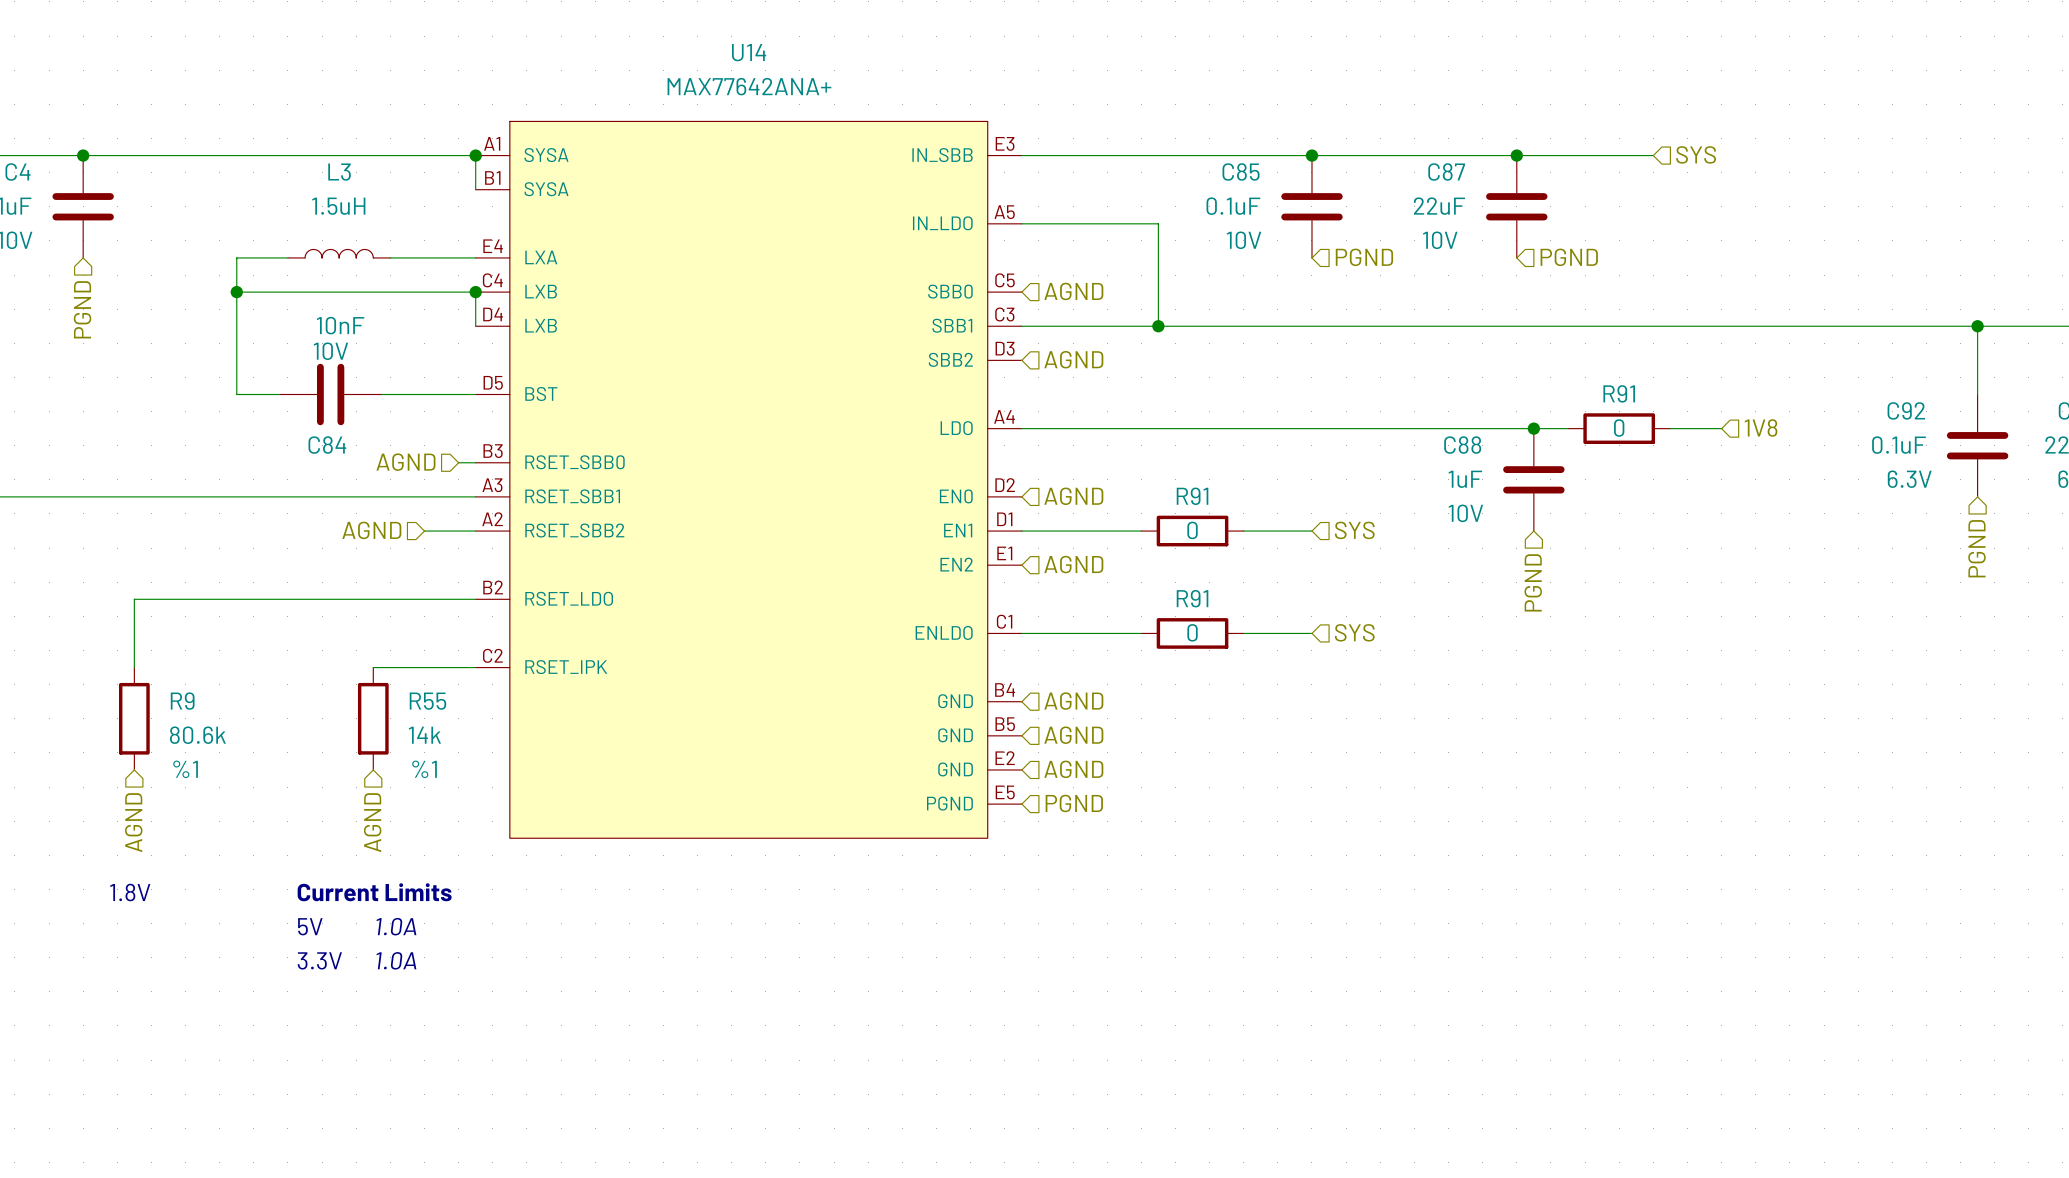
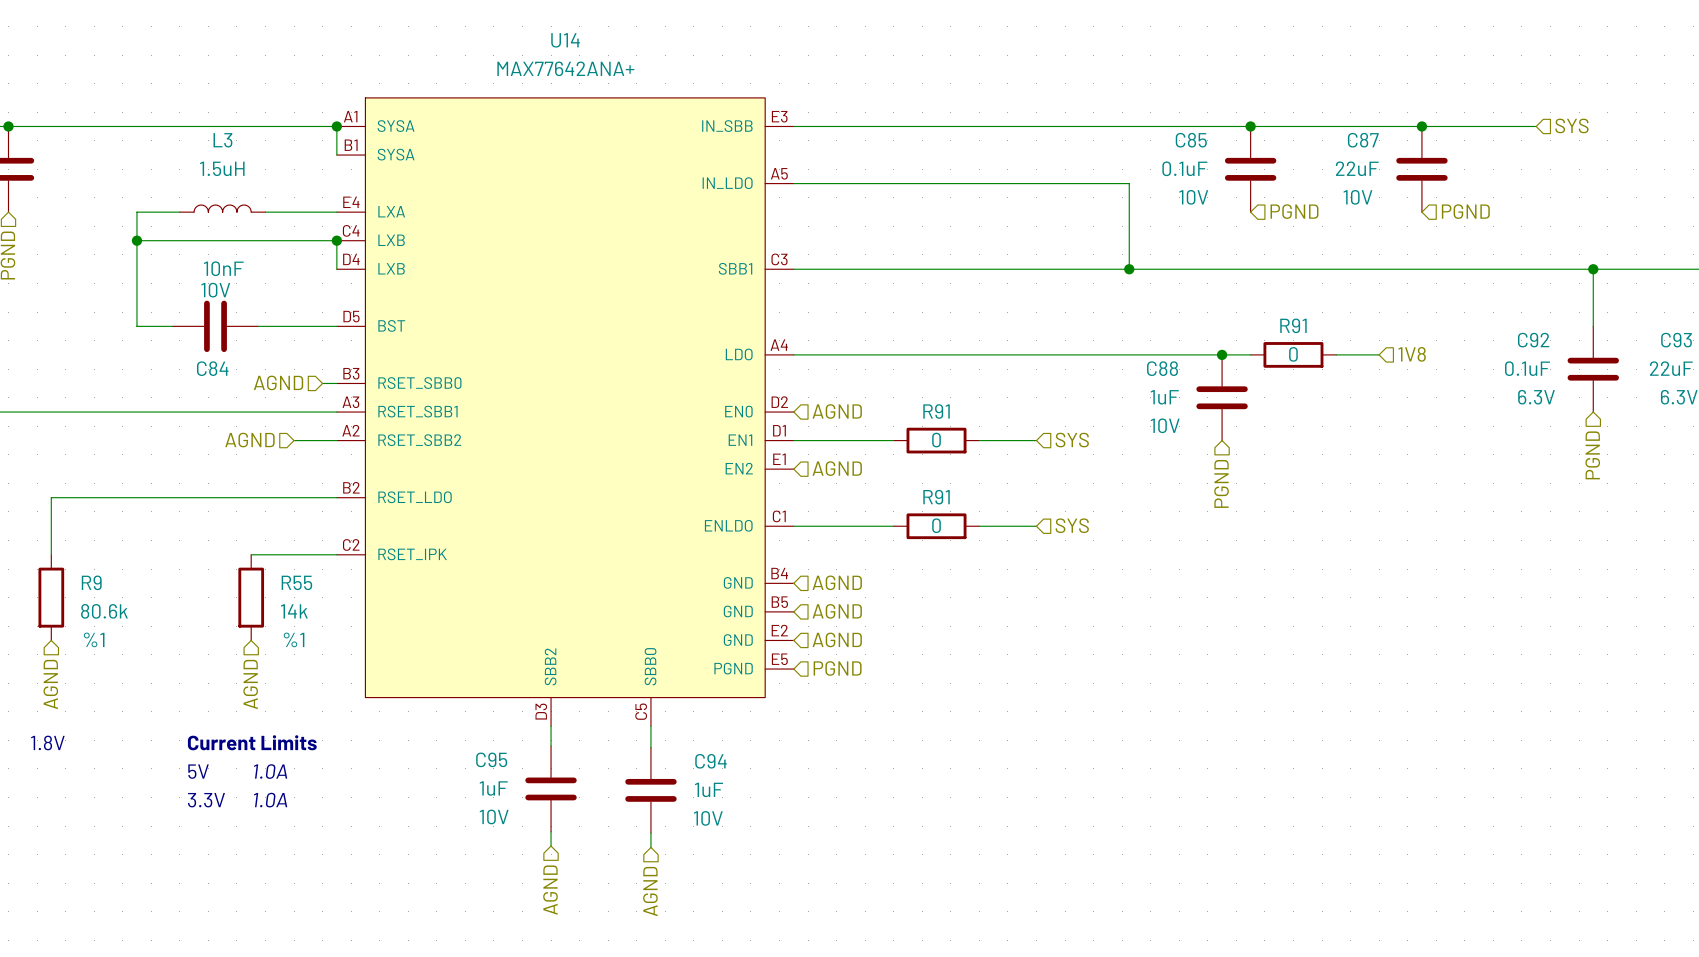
U14 symbol: [475, 121, 1022, 839] -> [336, 97, 794, 727]
hierarchical label position: SYS (1696, 154) -> SYS (1571, 125)
junction: (1311, 155) -> none
junction position: (1516, 155) -> (1250, 126)
wire: none -> (1322, 126) (1536, 126)
junction: none -> (1421, 126)
C85 position: (1311, 206) -> (1250, 169)
C87 position: (1516, 206) -> (1421, 169)
wire: (1158, 223) (1158, 326) -> (907, 183) (1129, 183) (1129, 269)
hierarchical label: PGND (1364, 257) -> none
hierarchical label position: PGND (1569, 257) -> PGND (1294, 211)
hierarchical label: none -> PGND (1465, 211)
hierarchical label: AGND (1073, 291) -> none
junction: (1158, 326) -> none
junction: none -> (1129, 269)
hierarchical label: AGND (1073, 359) -> none
wire: none -> (551, 726) (551, 746)
wire: none -> (650, 726) (650, 747)
C95: none -> 1uF (551, 788)
C94: none -> 1uF (650, 790)
wire: none -> (551, 831) (551, 846)
wire: none -> (650, 833) (650, 847)
hierarchical label: none -> AGND (550, 890)
hierarchical label: none -> AGND (650, 891)

